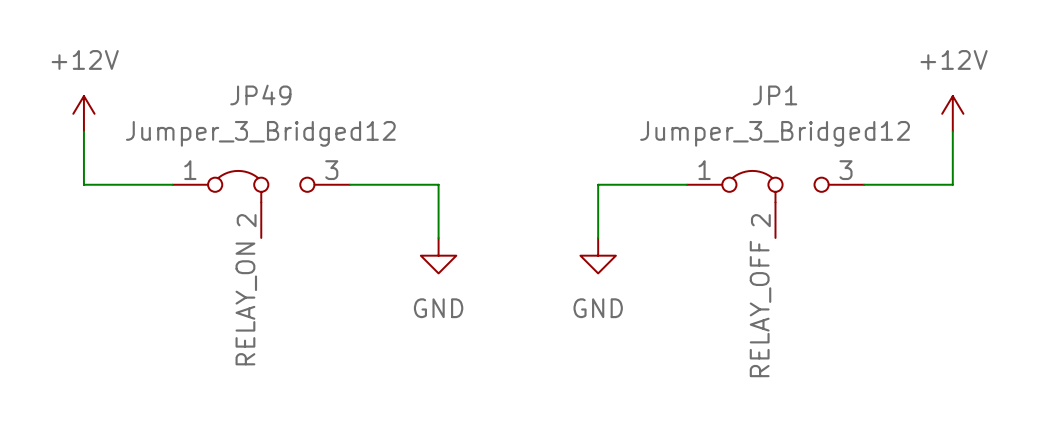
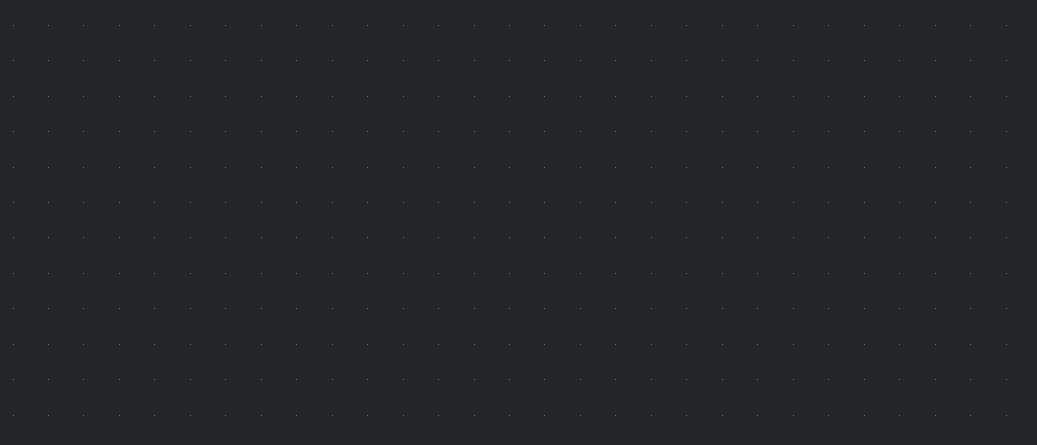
power symbol: +12V (83, 113) -> none
power symbol: +12V (952, 113) -> none
wire: (83, 131) (83, 184) (172, 184) -> none
wire: (952, 131) (952, 184) (864, 184) -> none
wire: (349, 184) (438, 184) (438, 237) -> none
wire: (686, 184) (598, 184) (598, 237) -> none
JP49: Jumper_3_Bridged12 (261, 204) -> none
JP1: Jumper_3_Bridged12 (775, 204) -> none
power symbol: GND (438, 255) -> none
power symbol: GND (598, 255) -> none
label: RELAY_ON (246, 303) -> none
label: RELAY_OFF (760, 309) -> none

